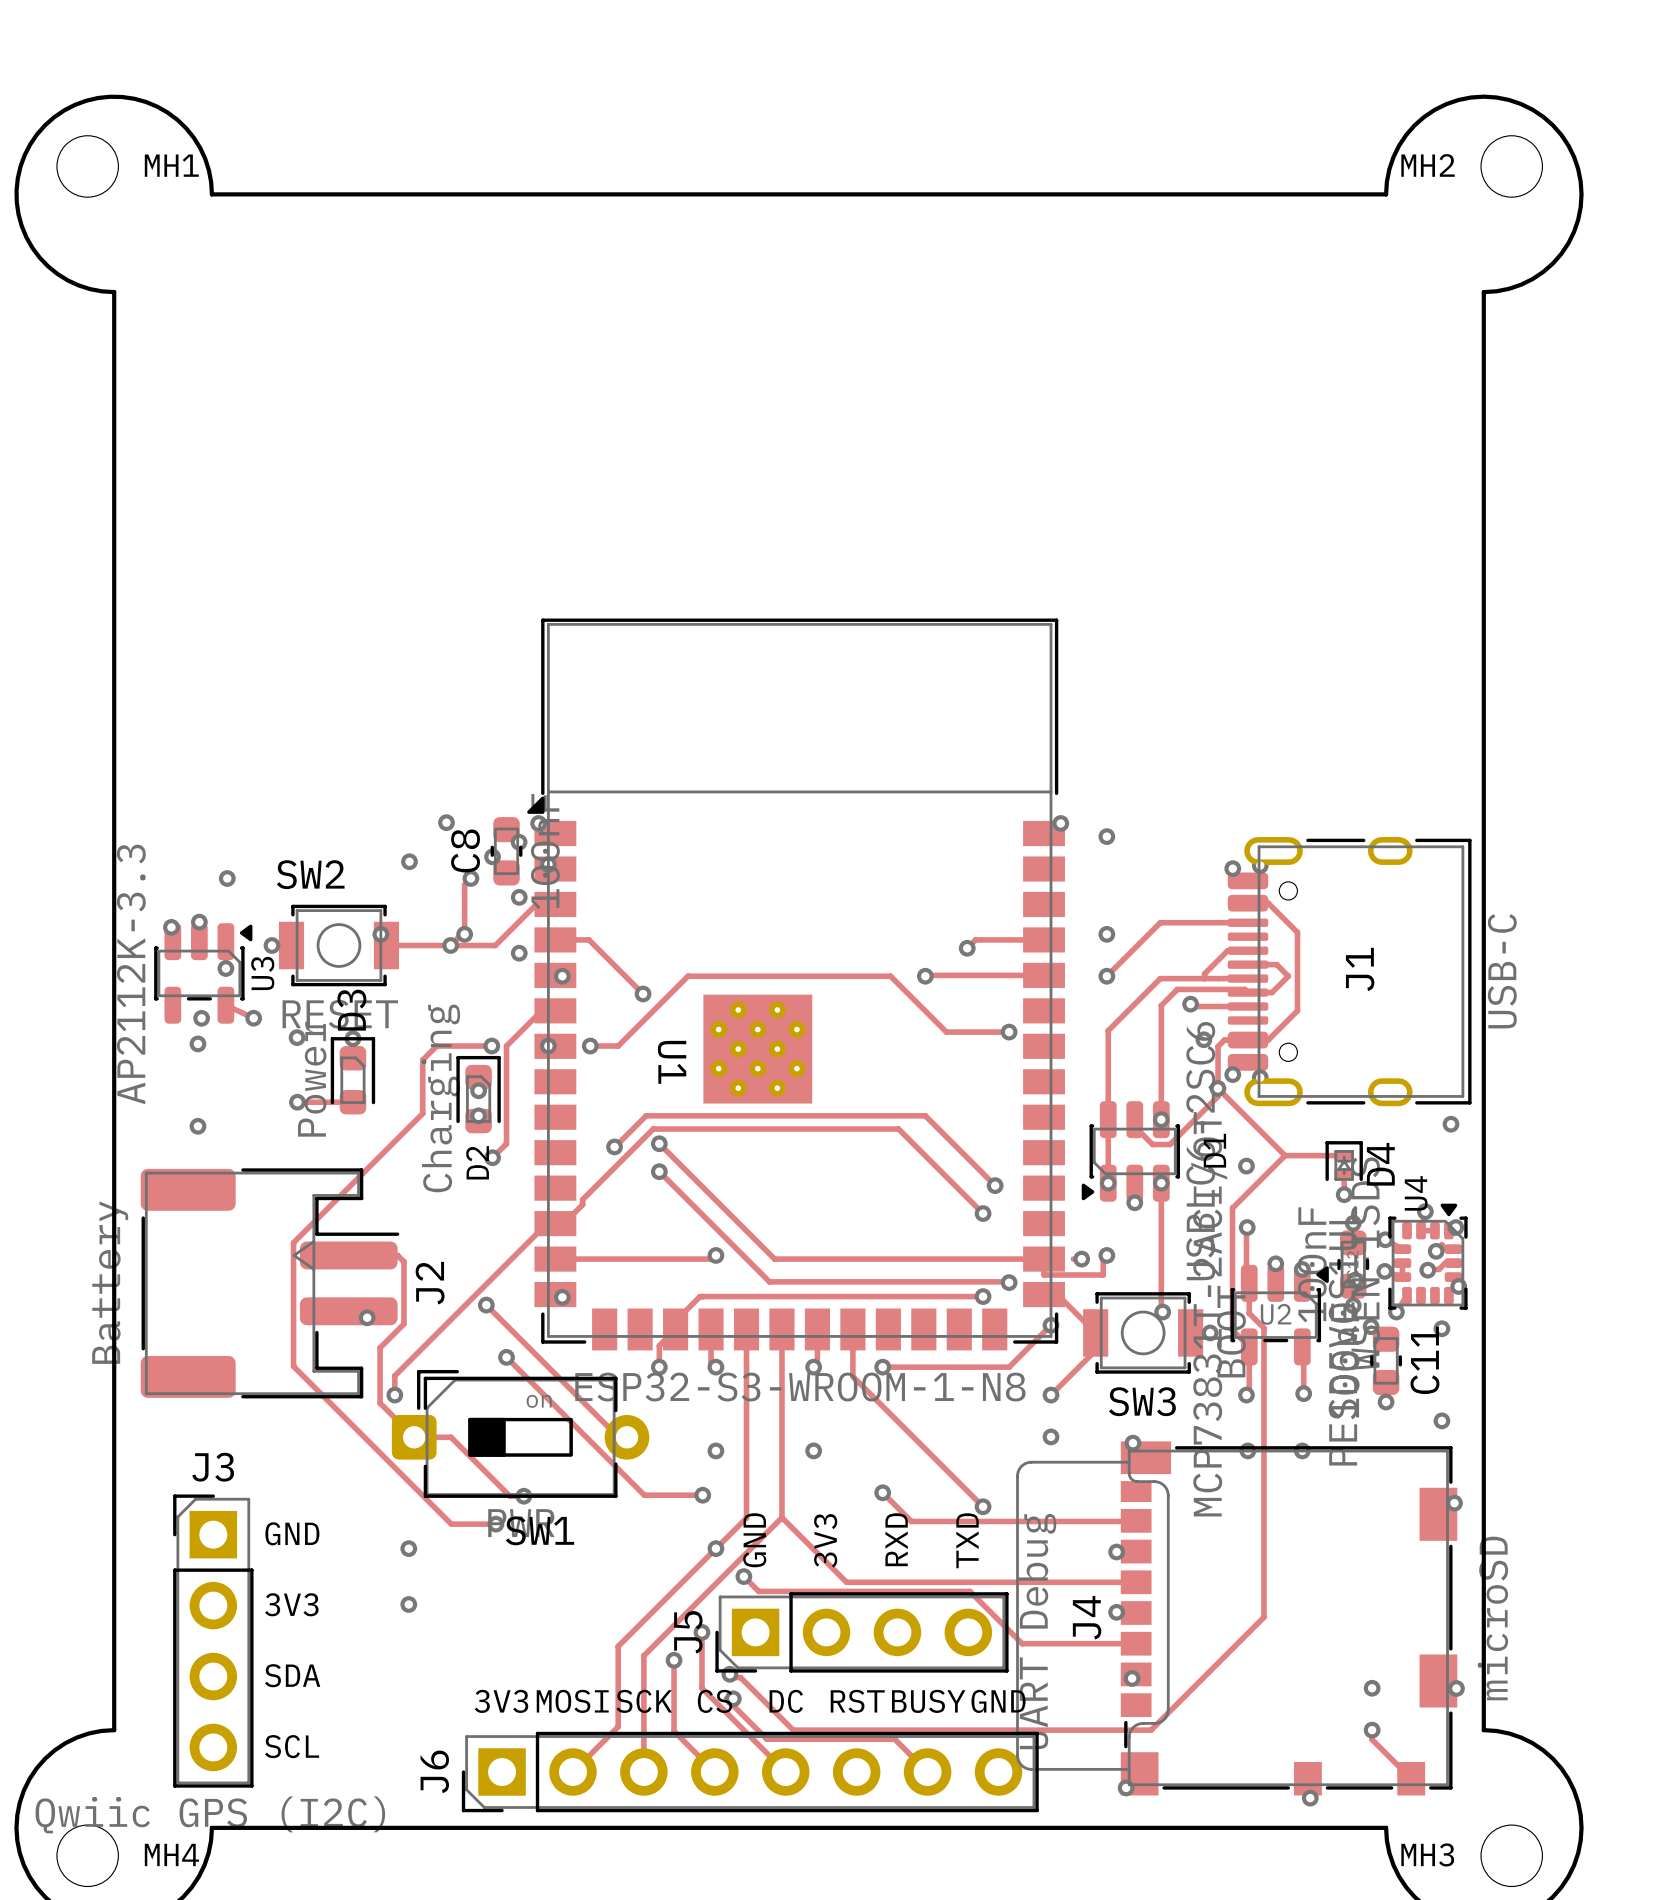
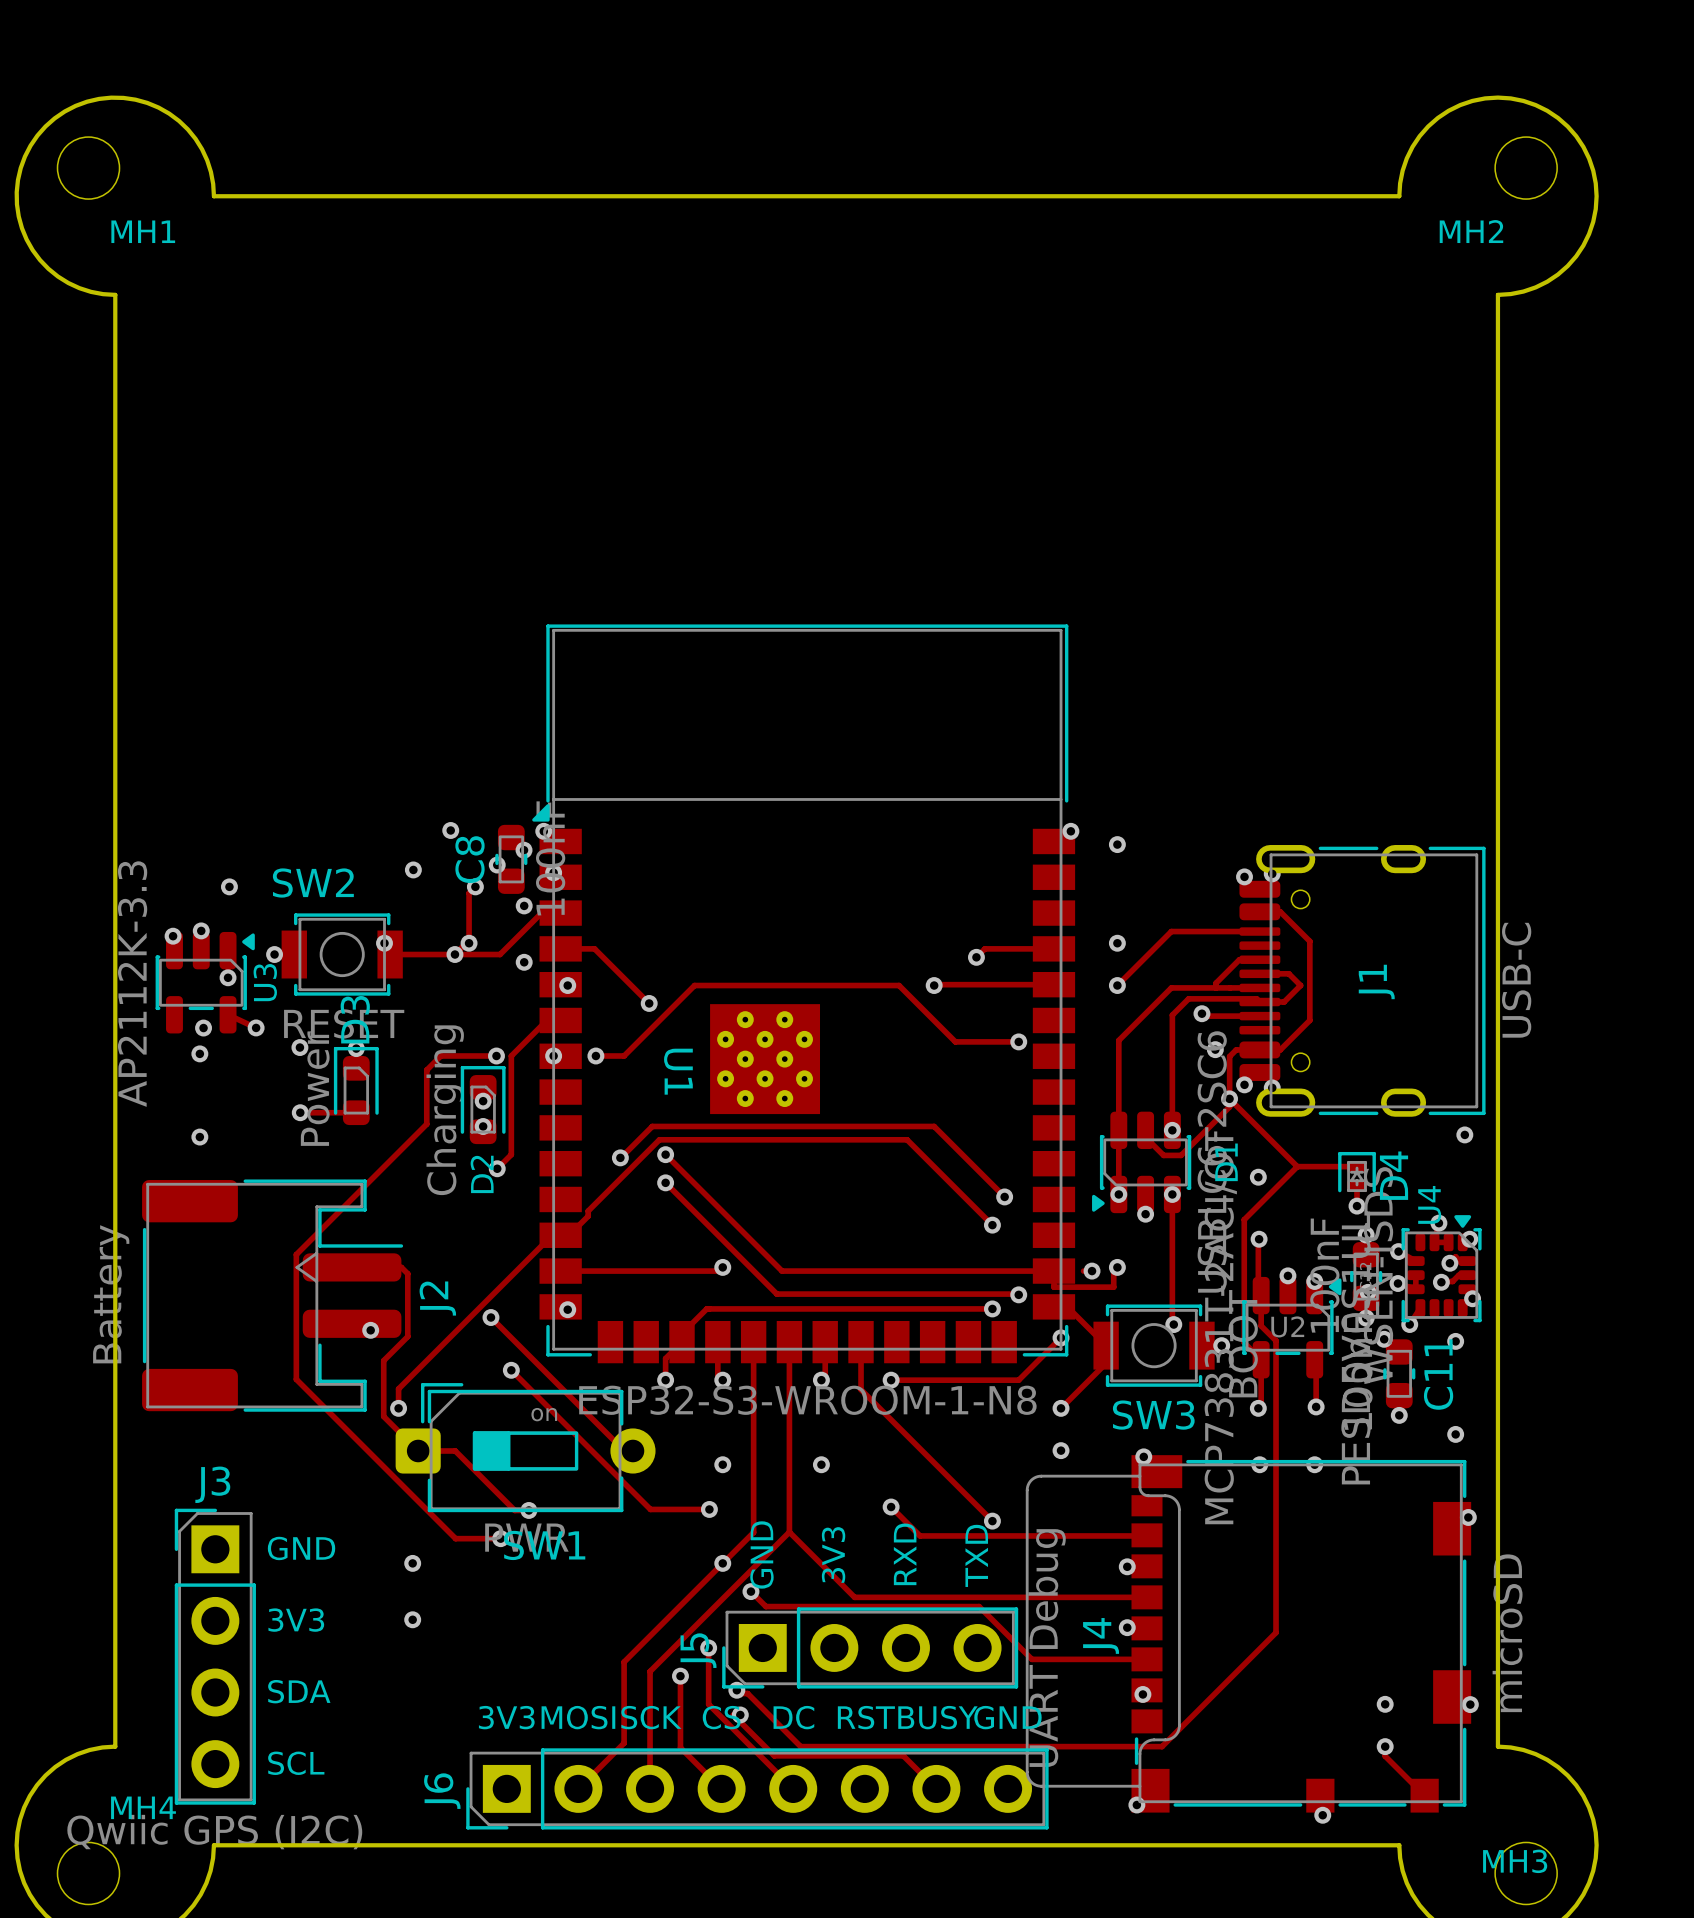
MH1 name position: MH1 (171, 165) -> MH1 (143, 231)
MH2 name position: MH2 (1428, 165) -> MH2 (1471, 231)
MH4 name position: MH4 (171, 1854) -> MH4 (143, 1807)
MH3 name position: MH3 (1427, 1854) -> MH3 (1515, 1861)

